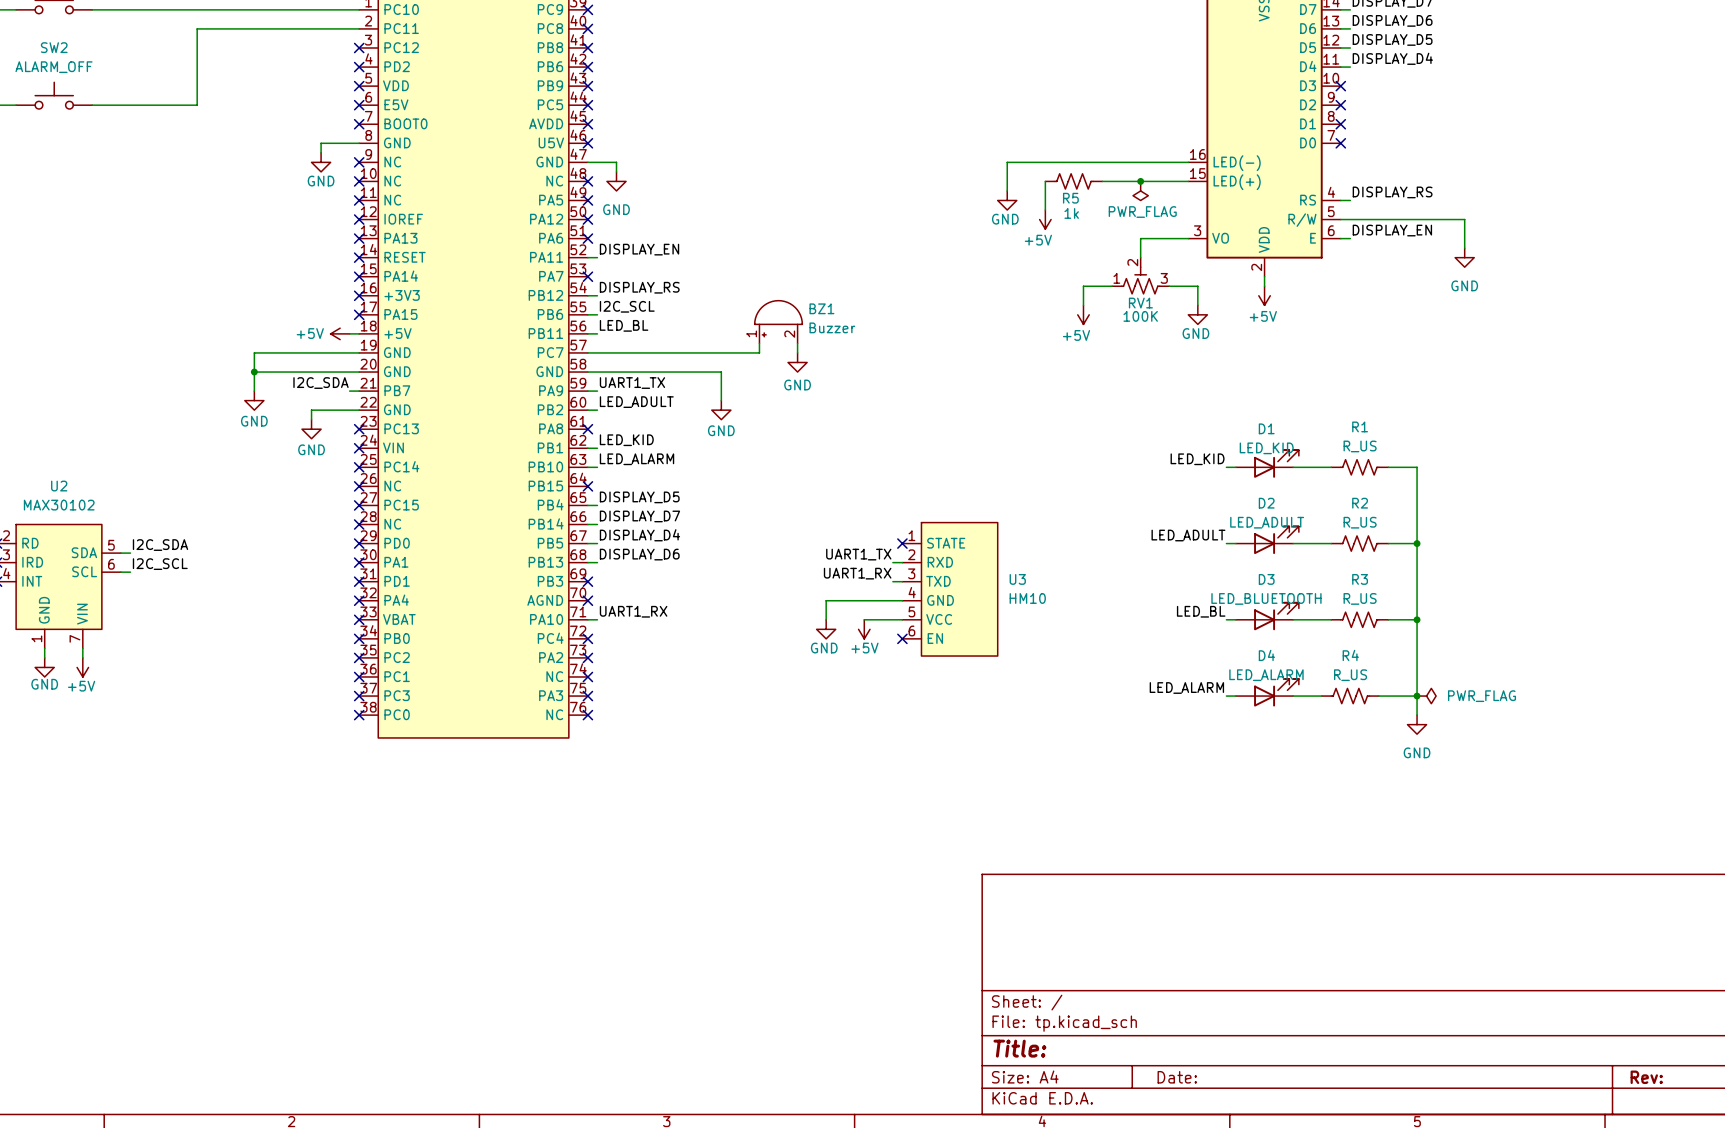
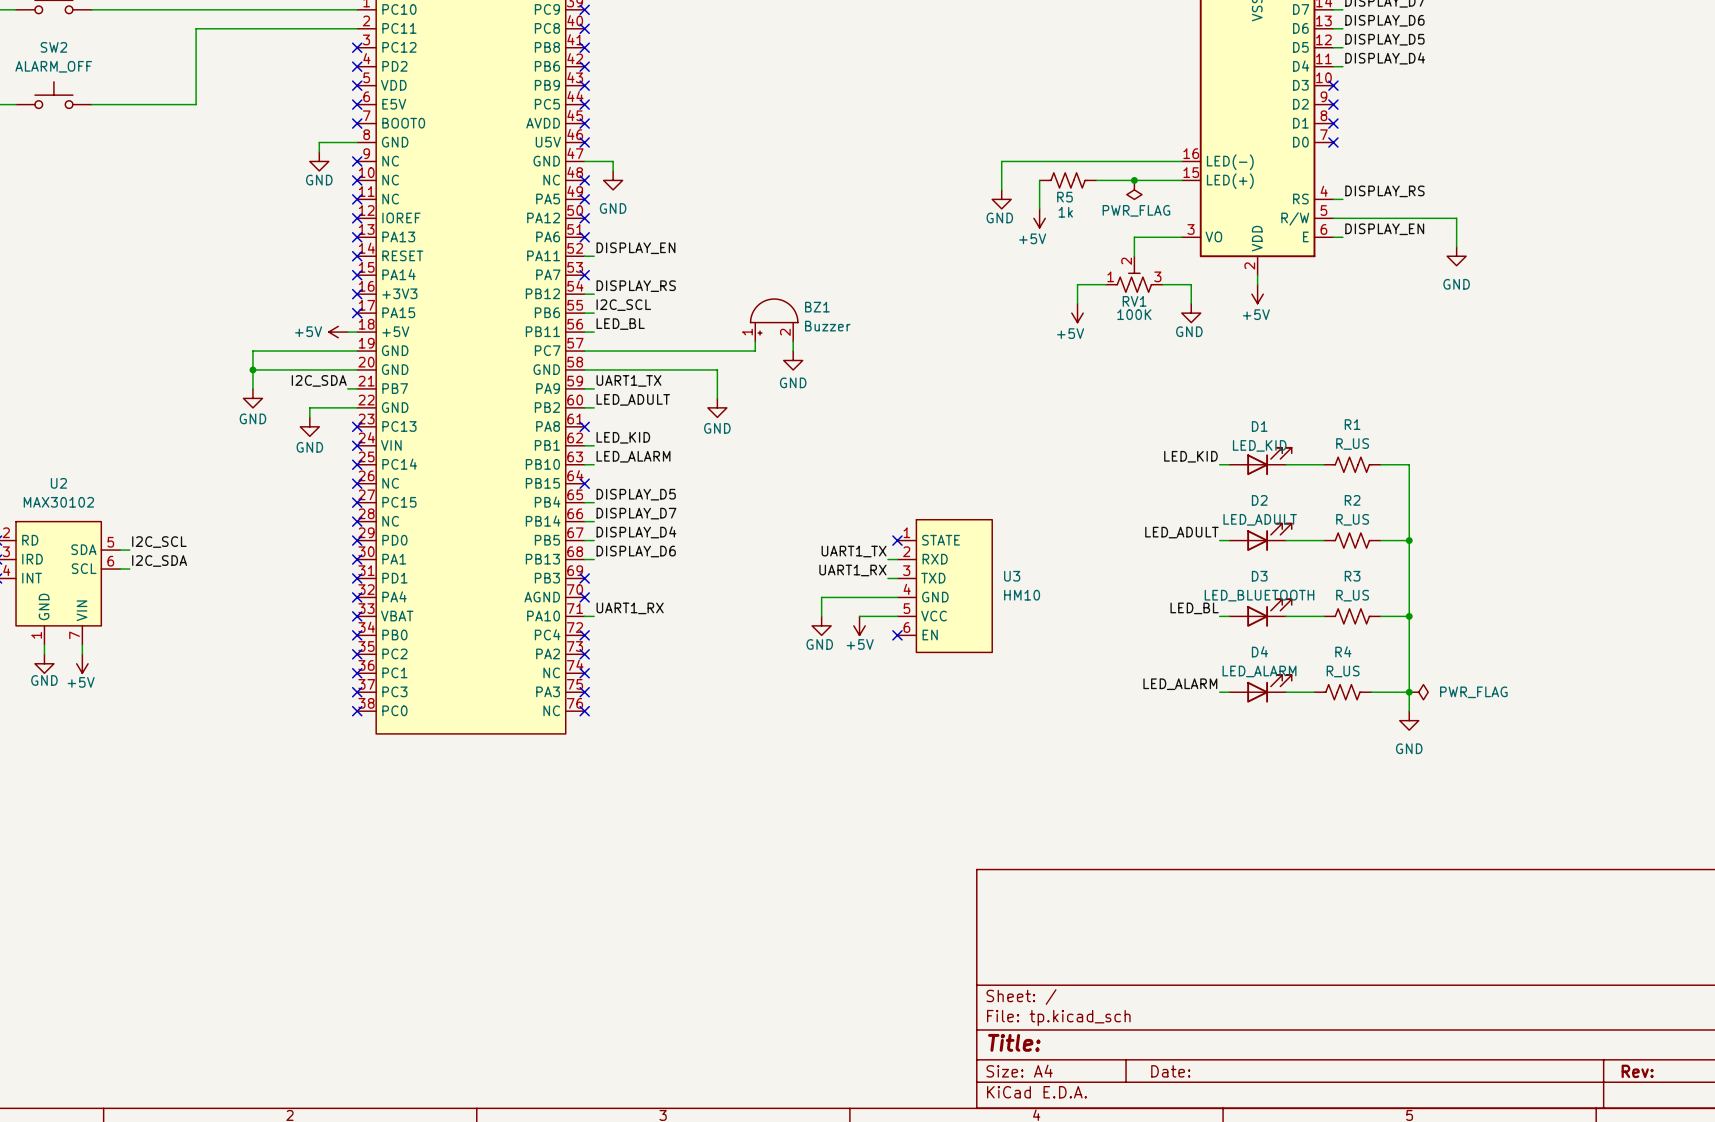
label: I2C_SDA (160, 545) -> I2C_SCL (159, 542)
label: I2C_SCL (160, 564) -> I2C_SDA (159, 561)

